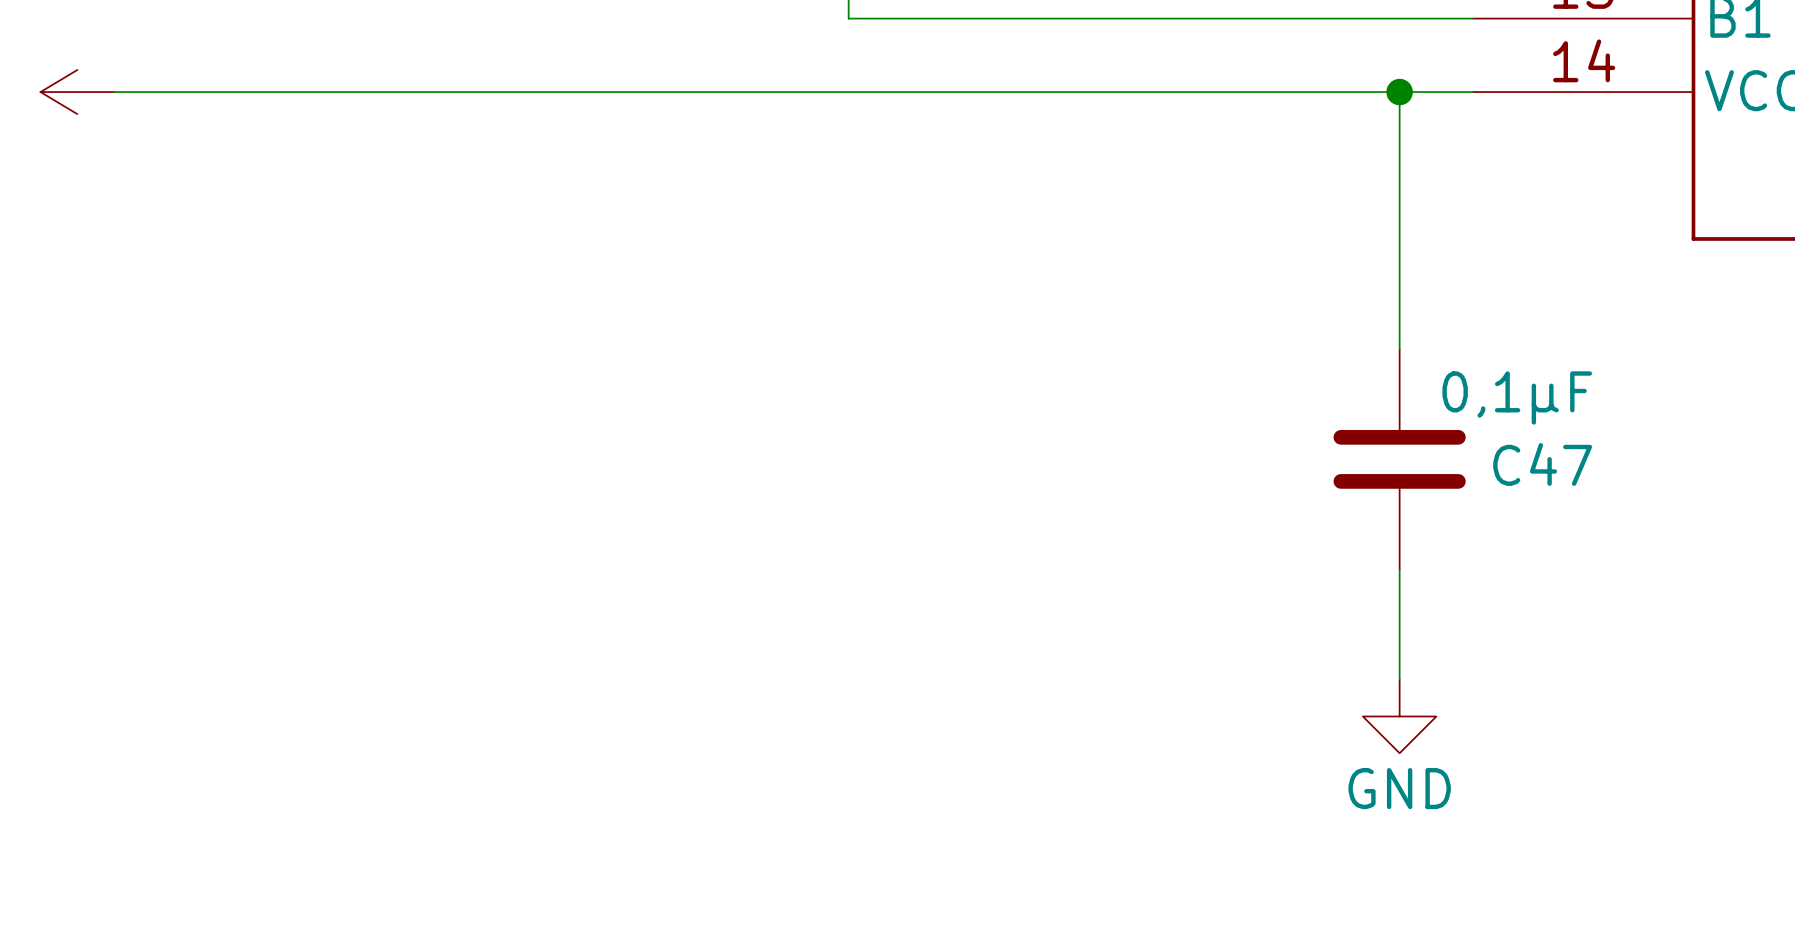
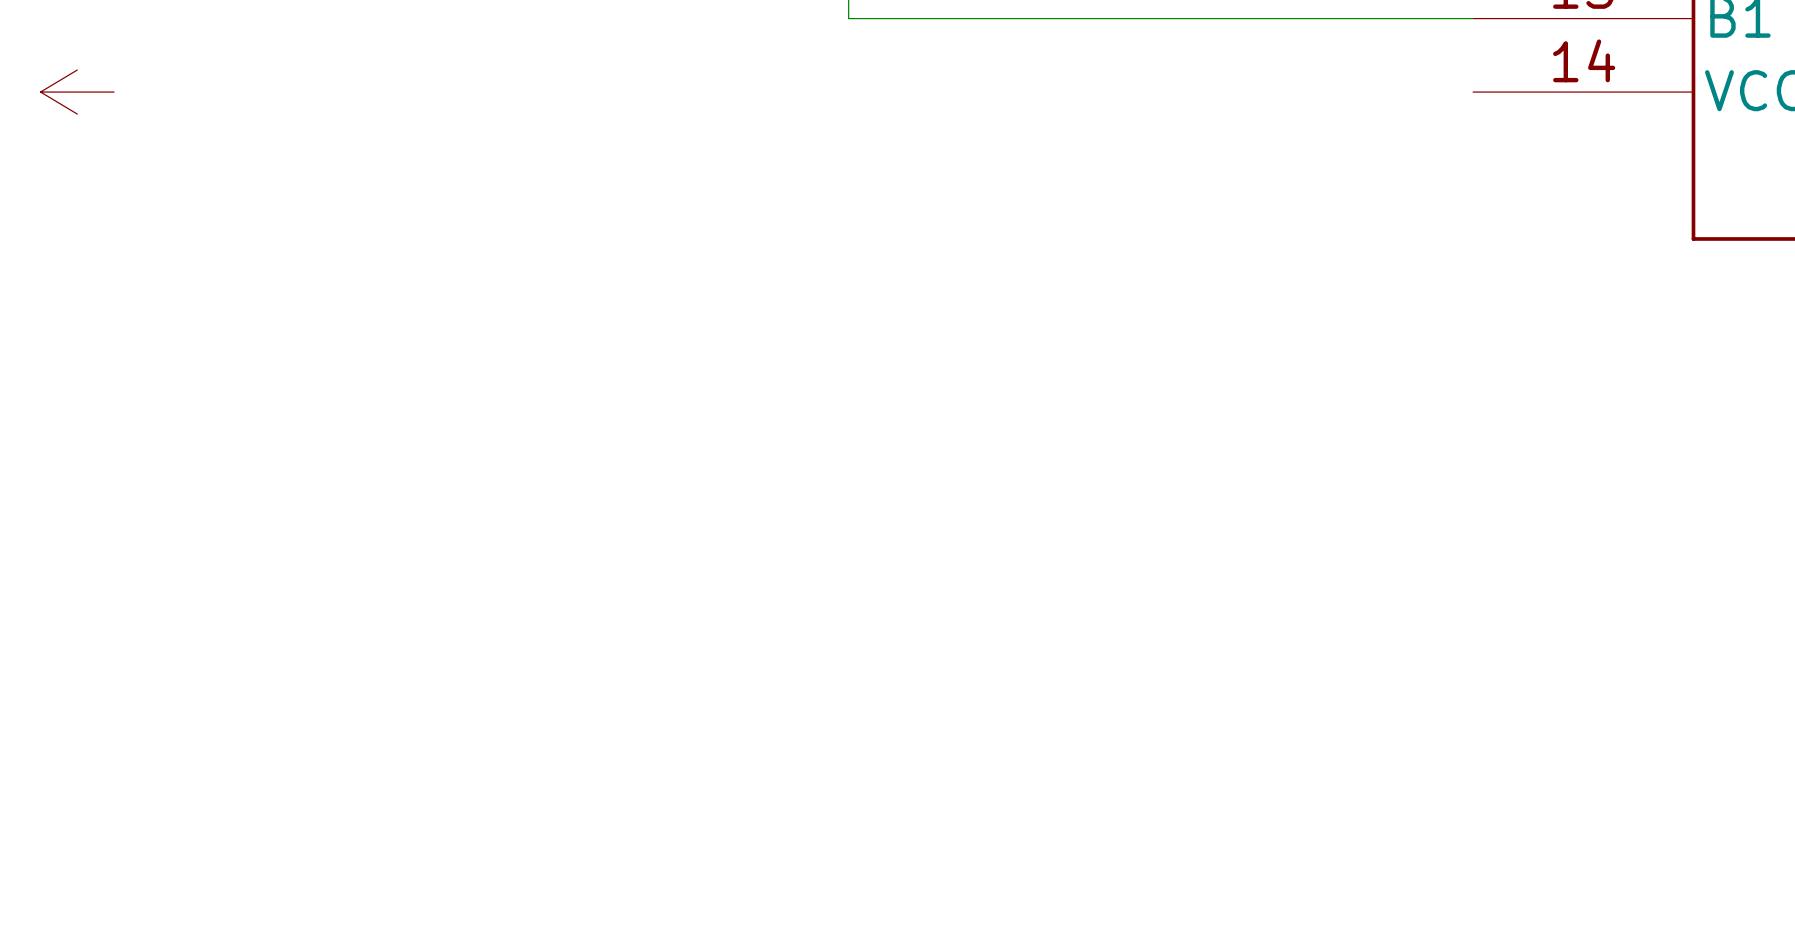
wire: (114, 92) (1473, 92) -> none
wire: (1399, 92) (1399, 349) -> none
junction: (1399, 92) -> none
C47: 0,1µF (1399, 459) -> none
wire: (1399, 569) (1399, 679) -> none
power symbol: GND (1399, 716) -> none

